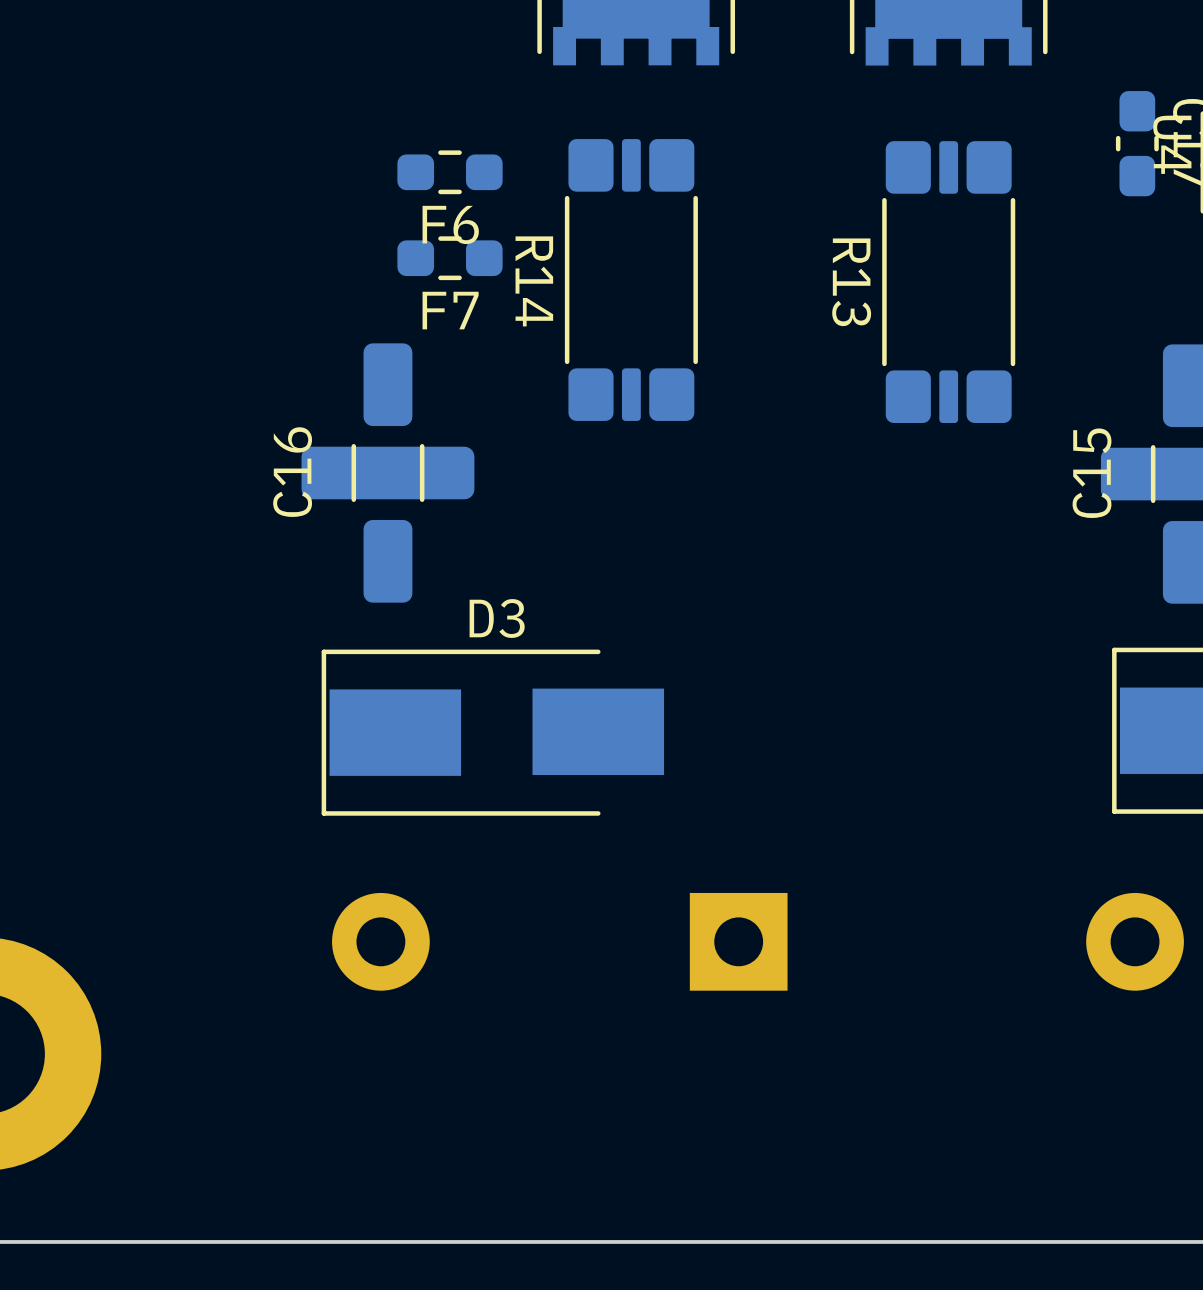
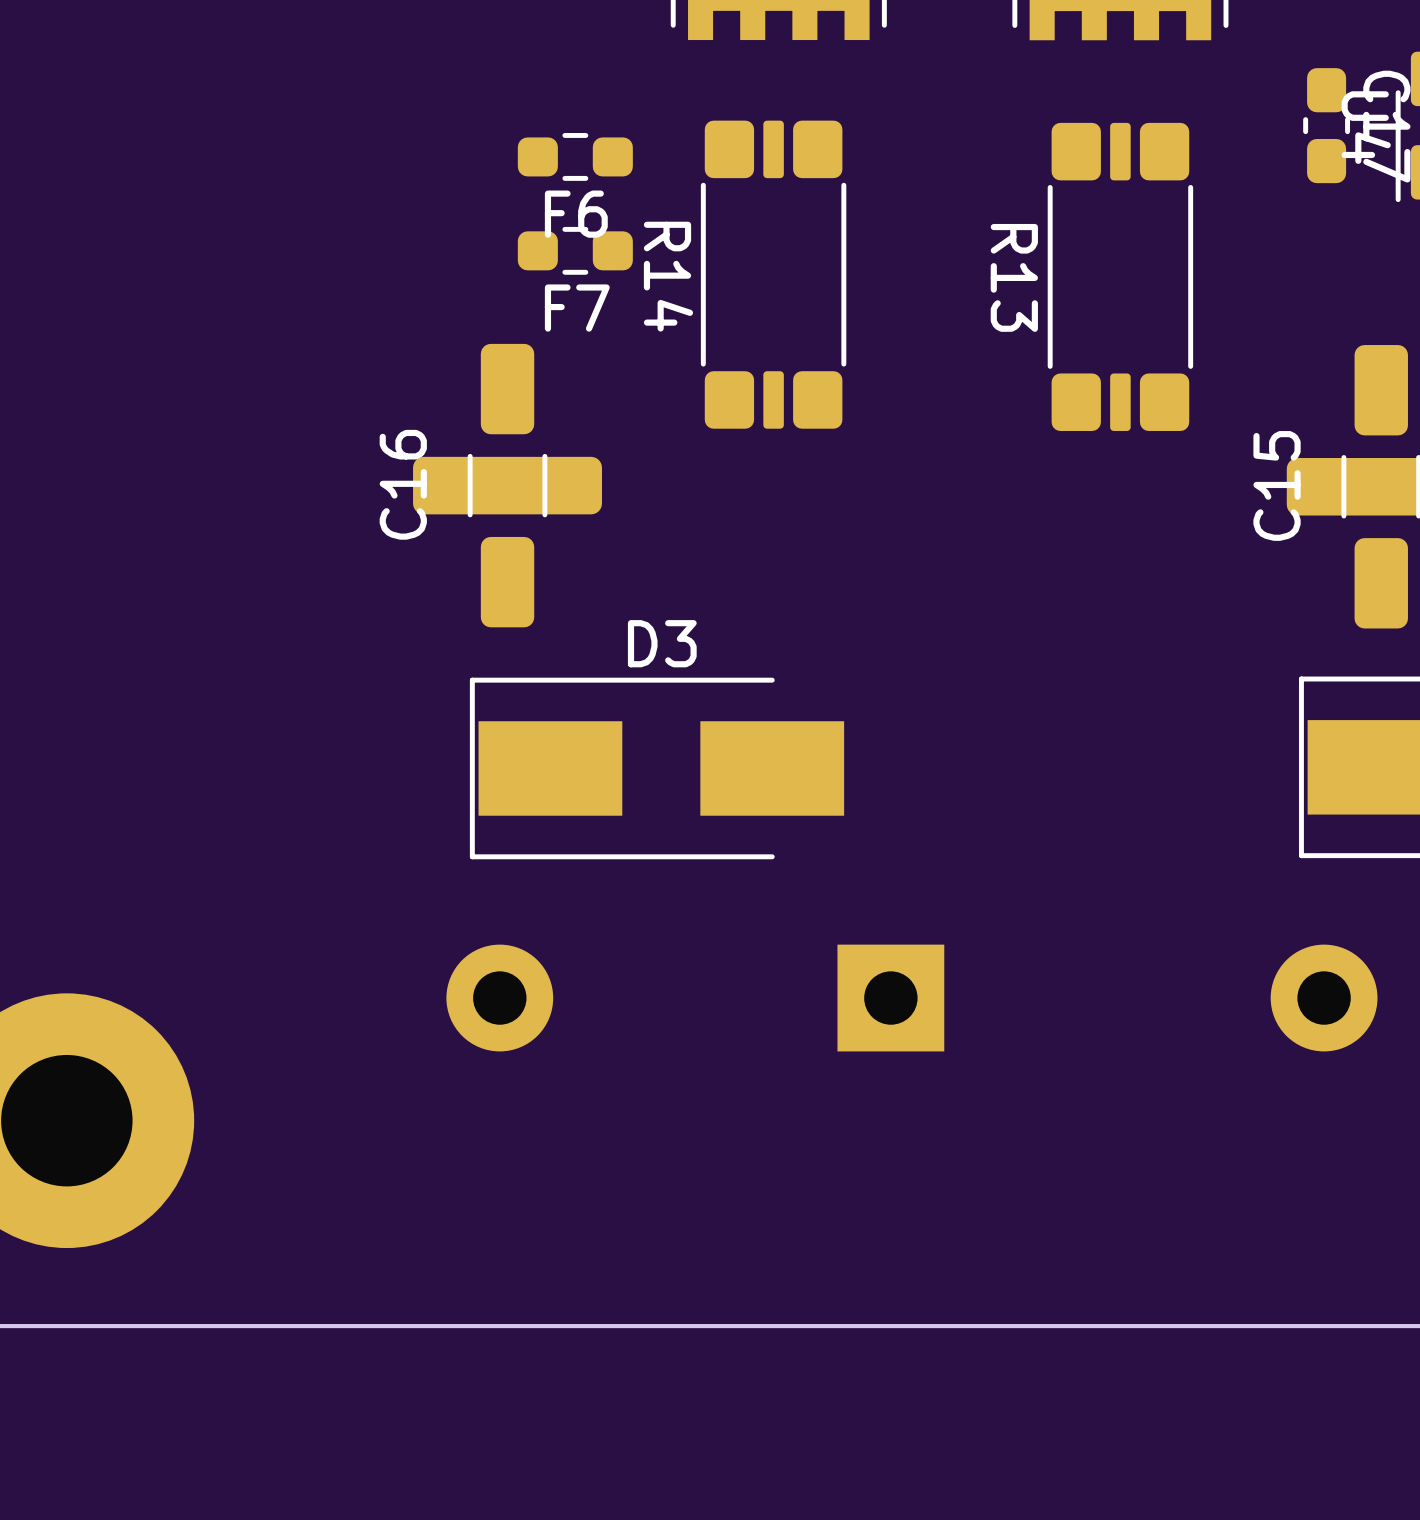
D3 position: (492, 732) -> (657, 768)

